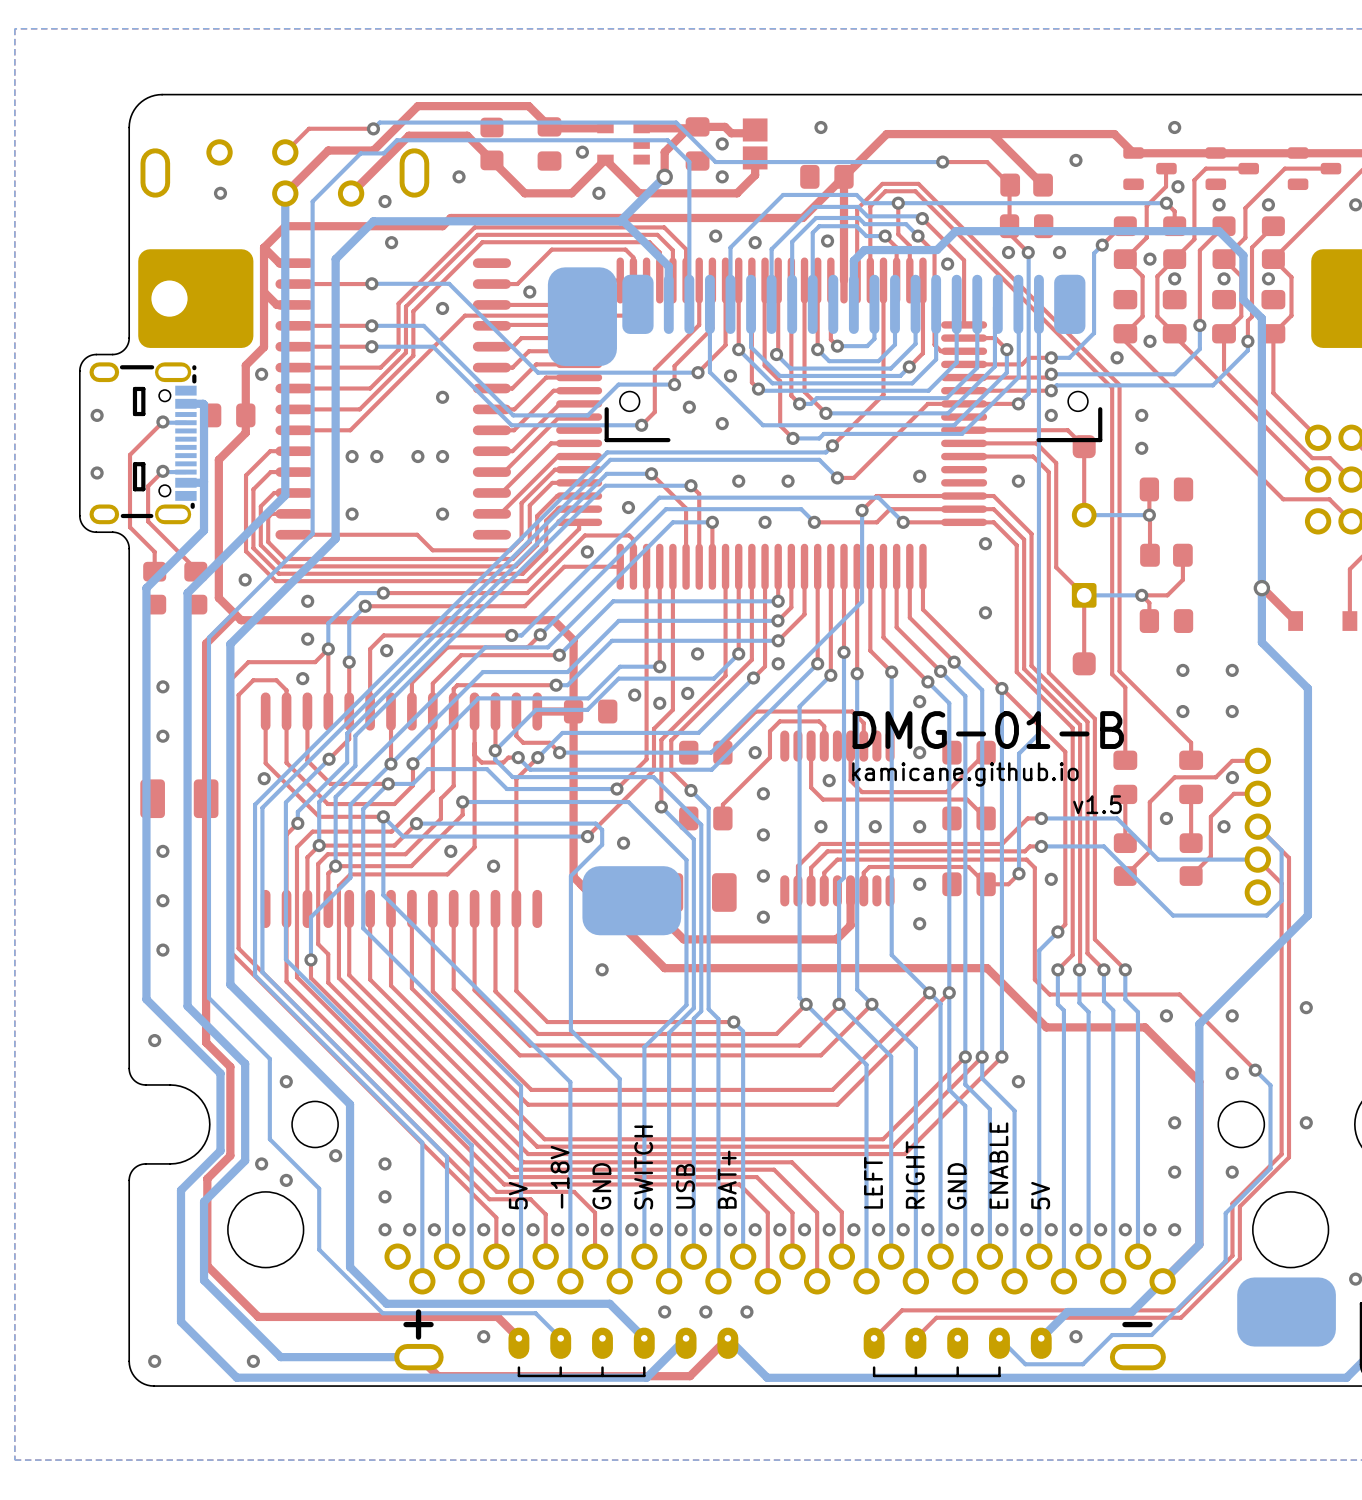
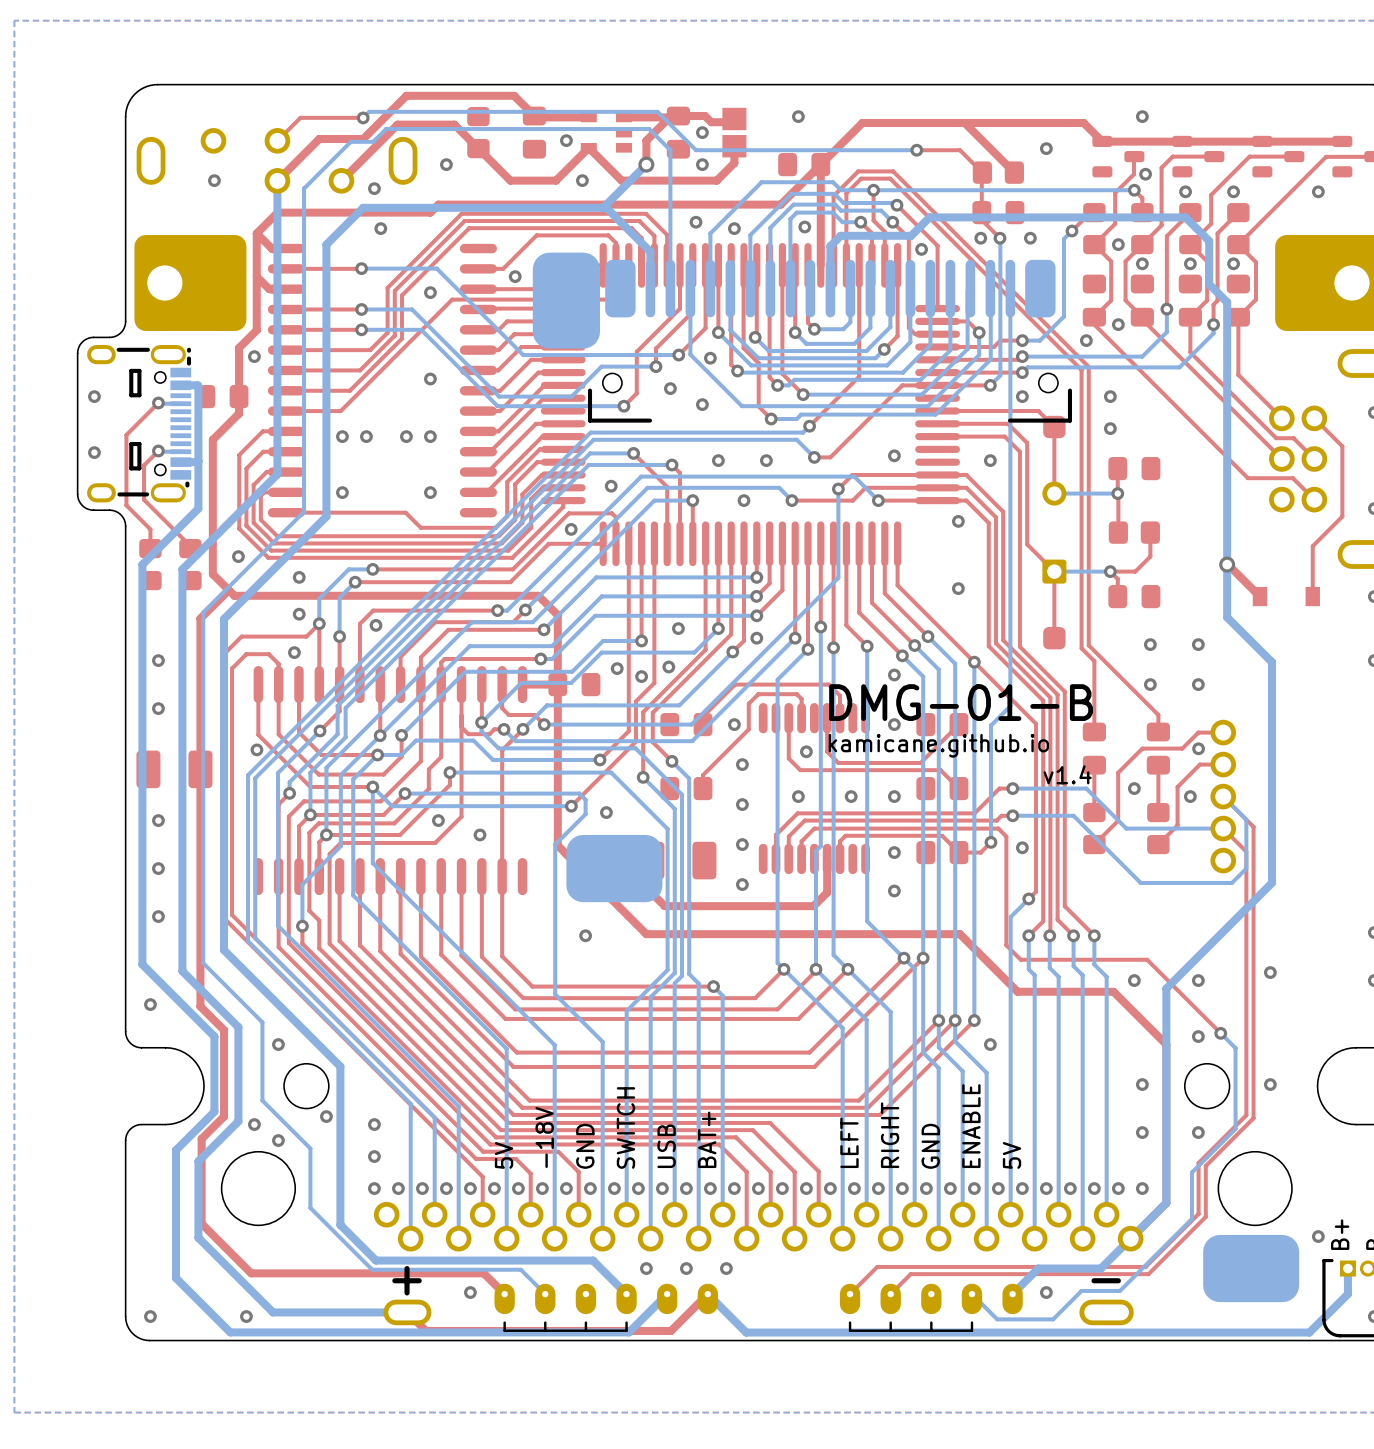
text: v1.5 (1097, 804) -> v1.4 (1067, 774)

